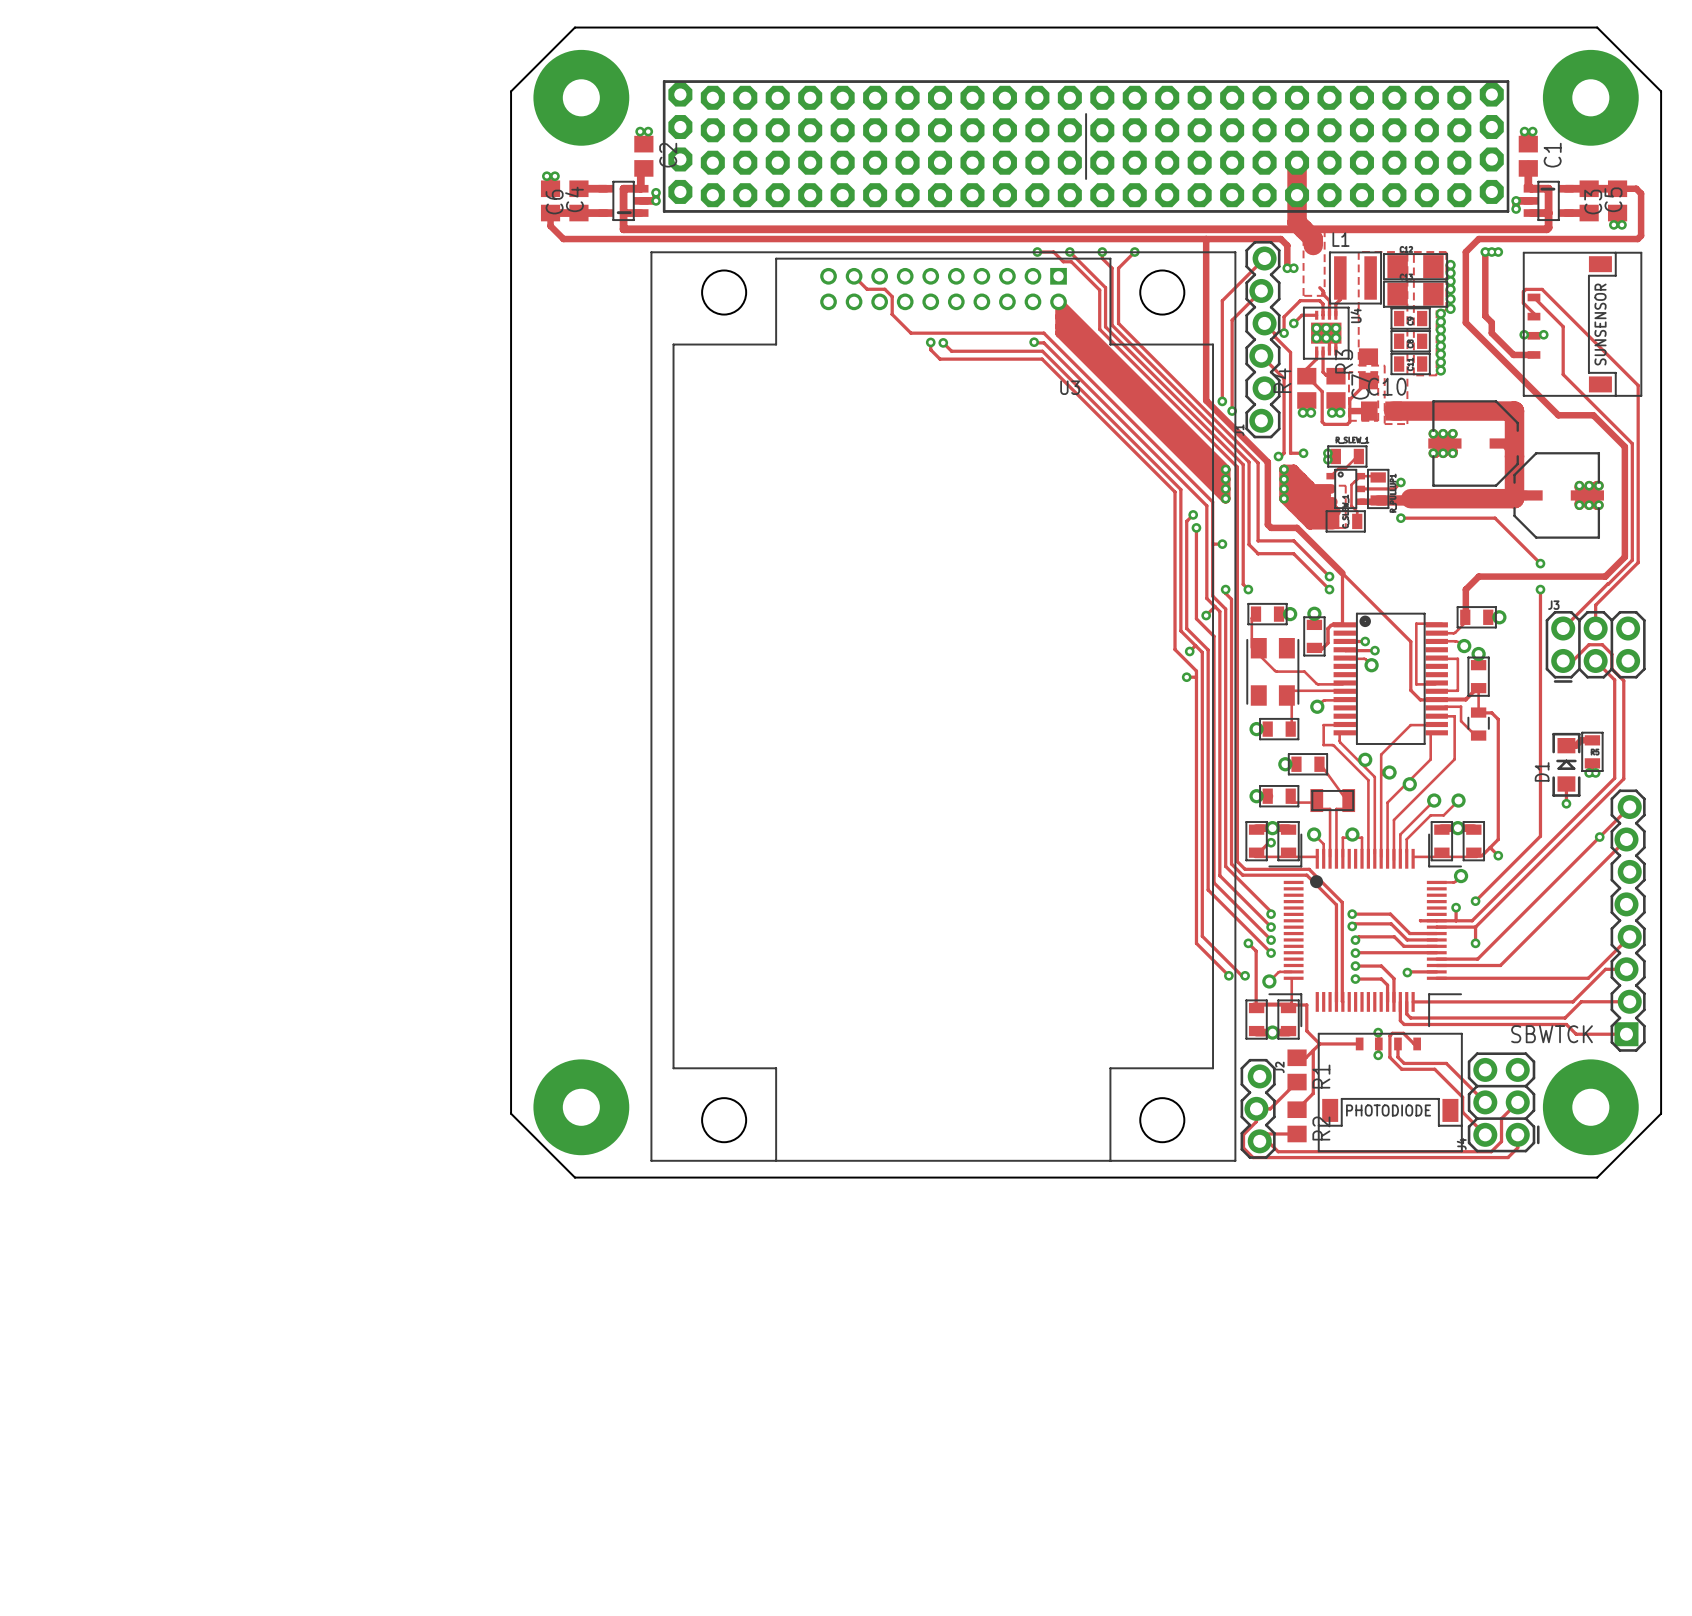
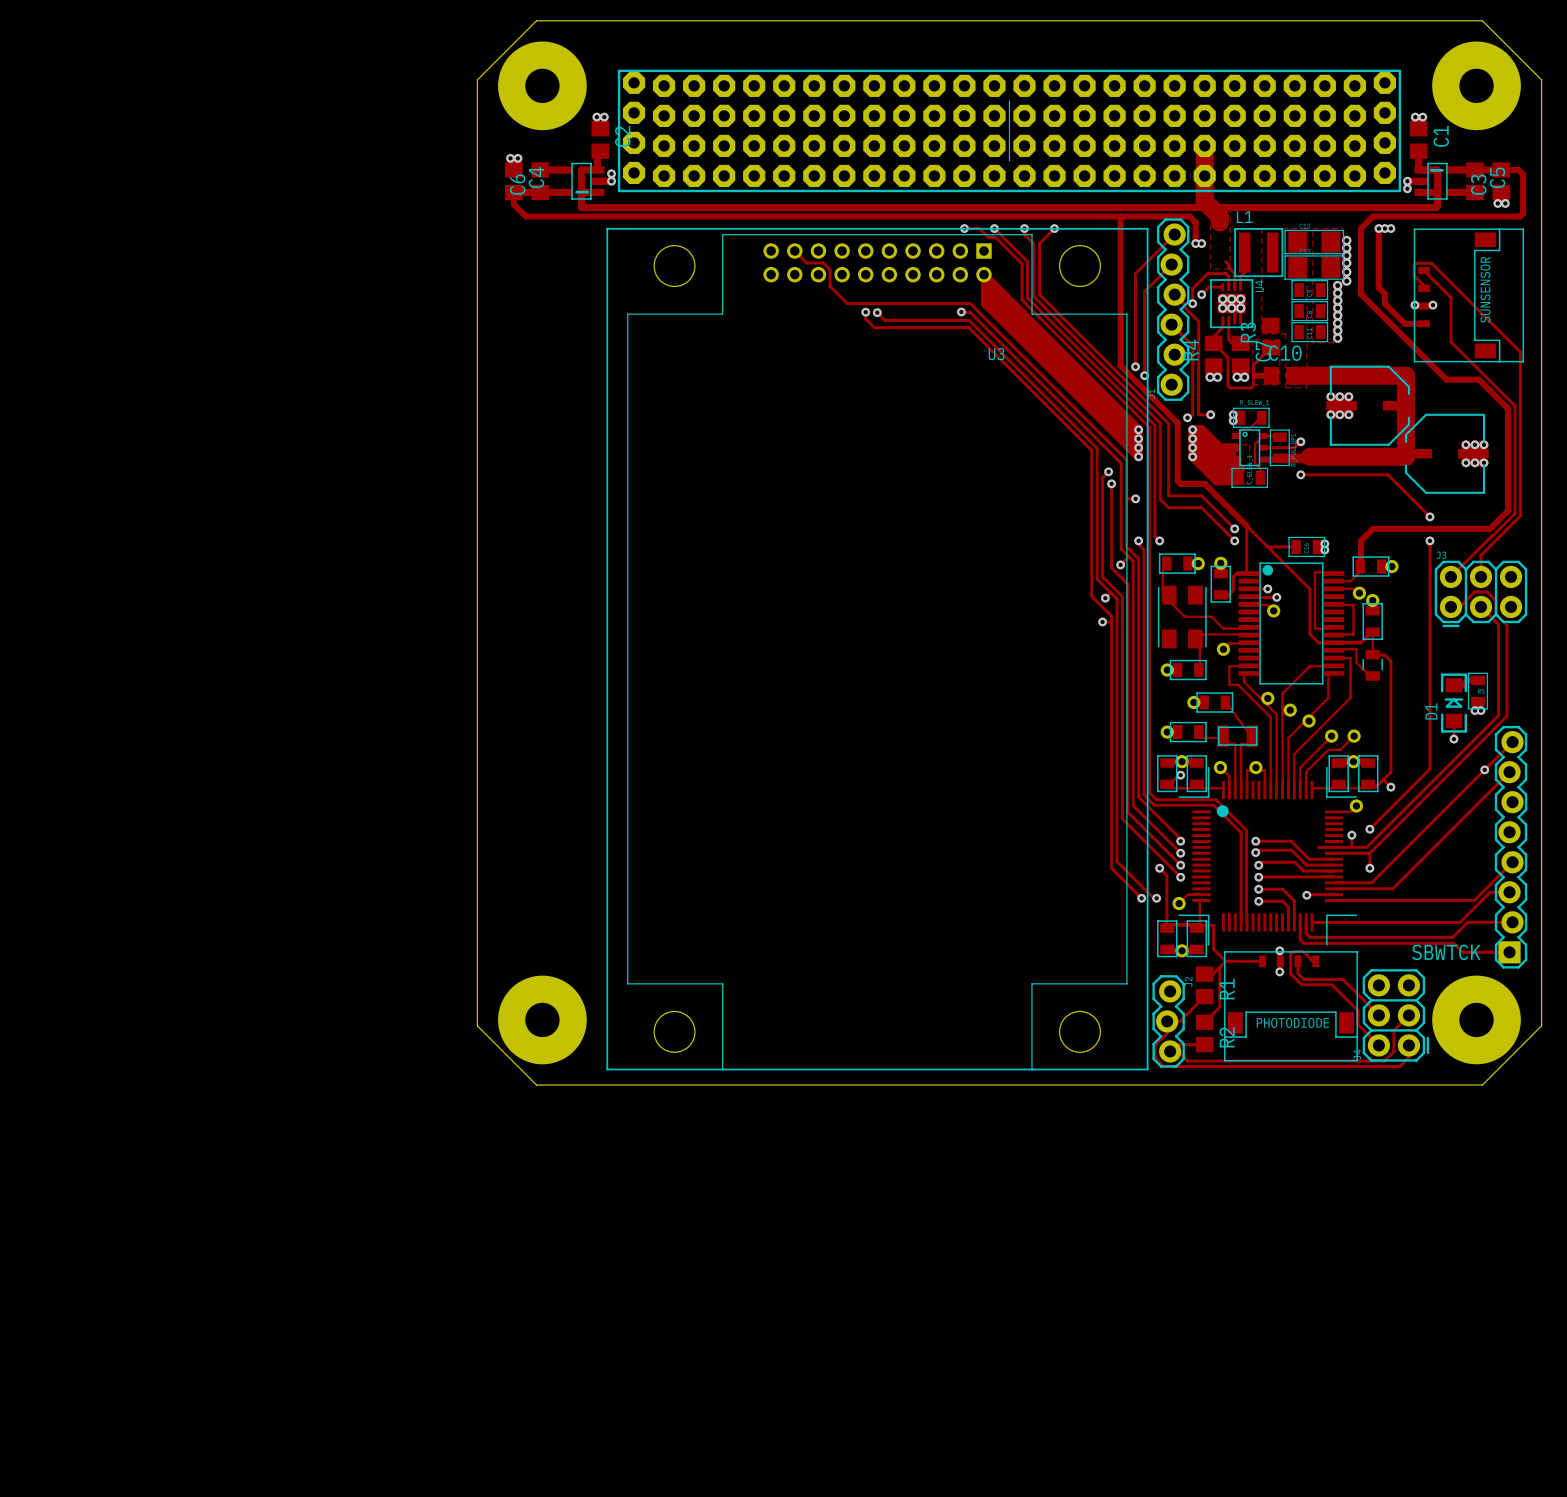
via: none -> (1324, 543)
track: none -> (1267, 546) (1296, 546)
part: none -> (1306, 546)
via: none -> (1324, 549)

